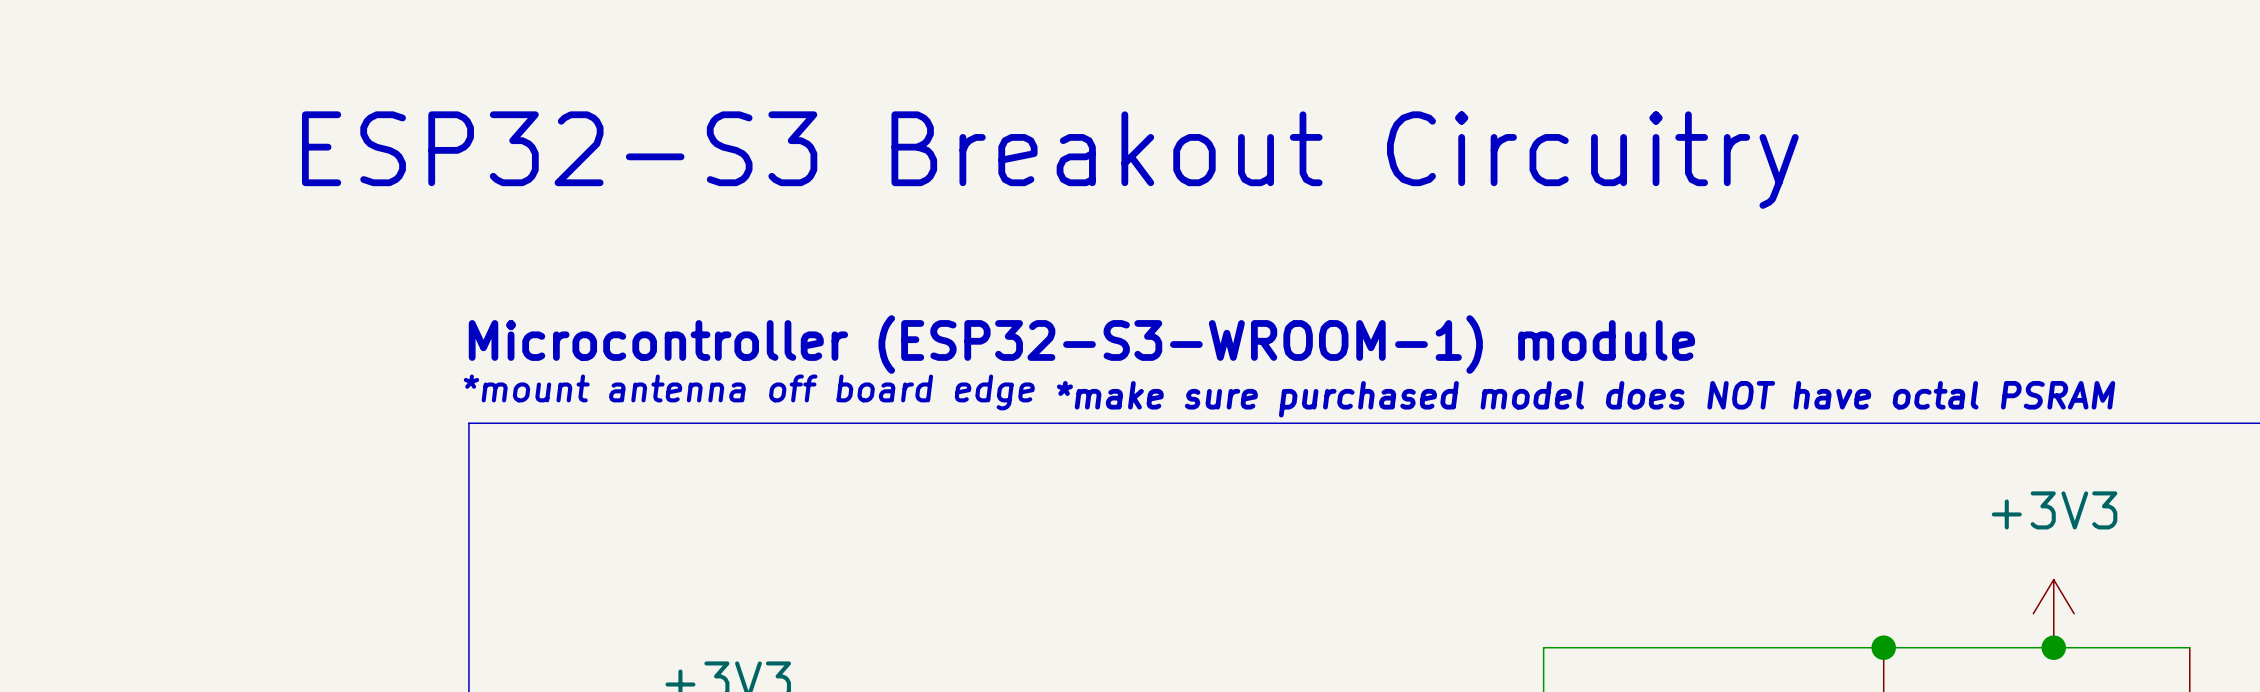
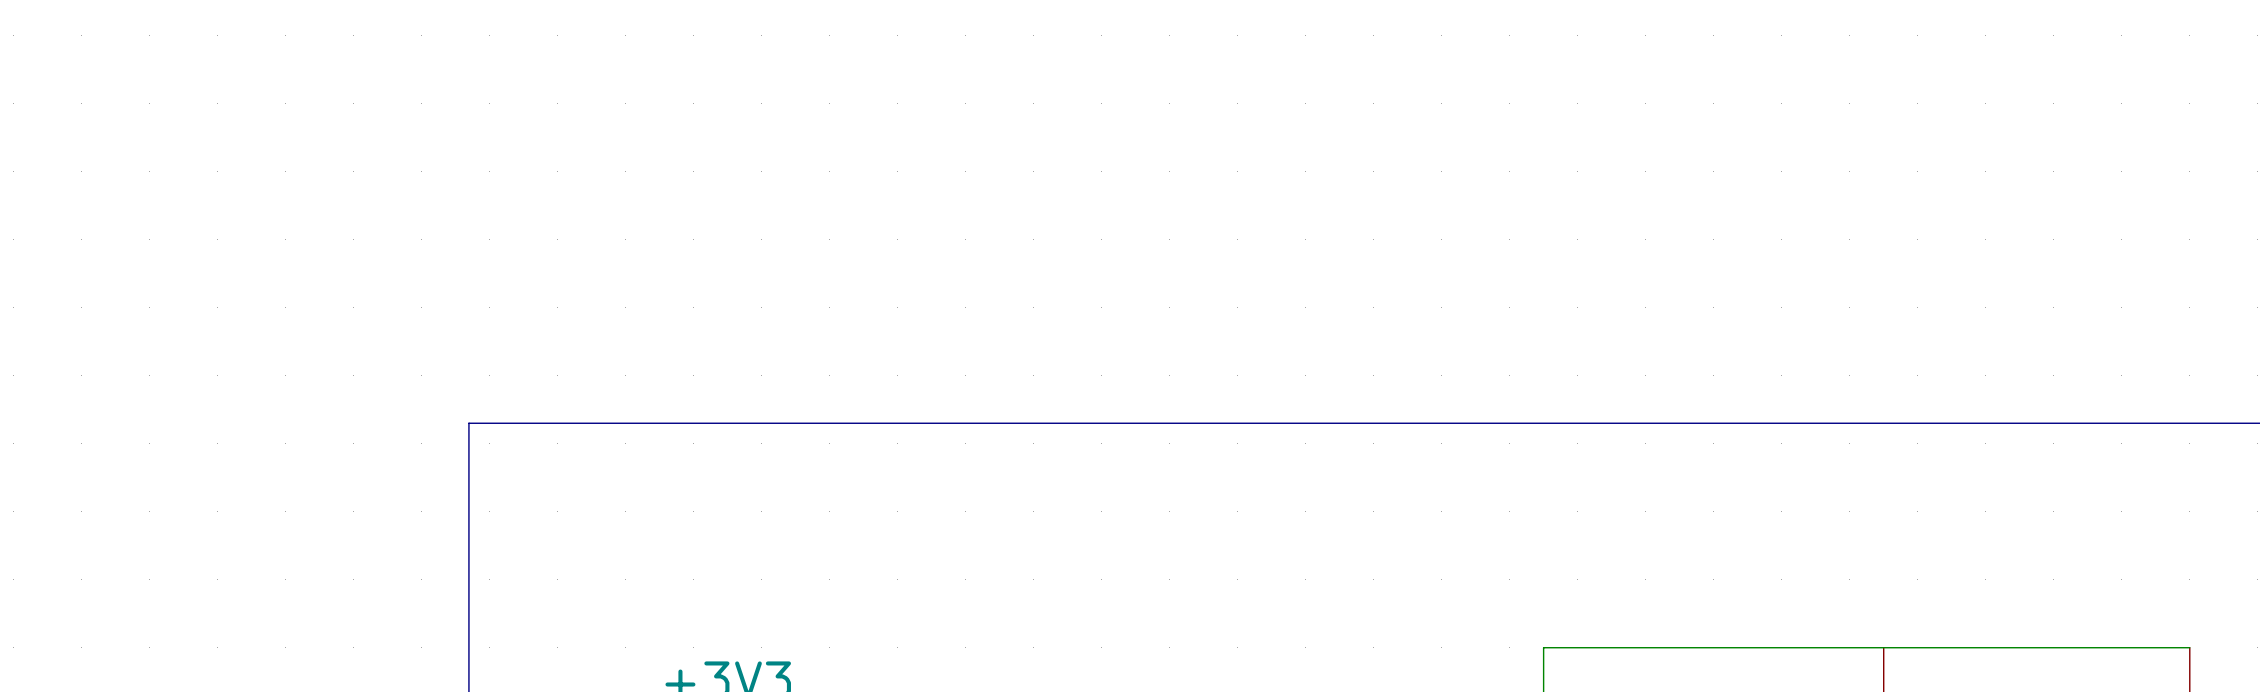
text: ESP32-S3 Breakout Circuitry (1050, 160) -> none
text: Microcontroller (ESP32-S3-WROOM-1) module (1081, 344) -> none
text: *mount antenna off board edge (749, 392) -> none
text: *make sure purchased model does NOT have octal PSRAM (1586, 399) -> none
power symbol: +3V3 (2053, 613) -> none
junction: (1883, 647) -> none
junction: (2053, 647) -> none

